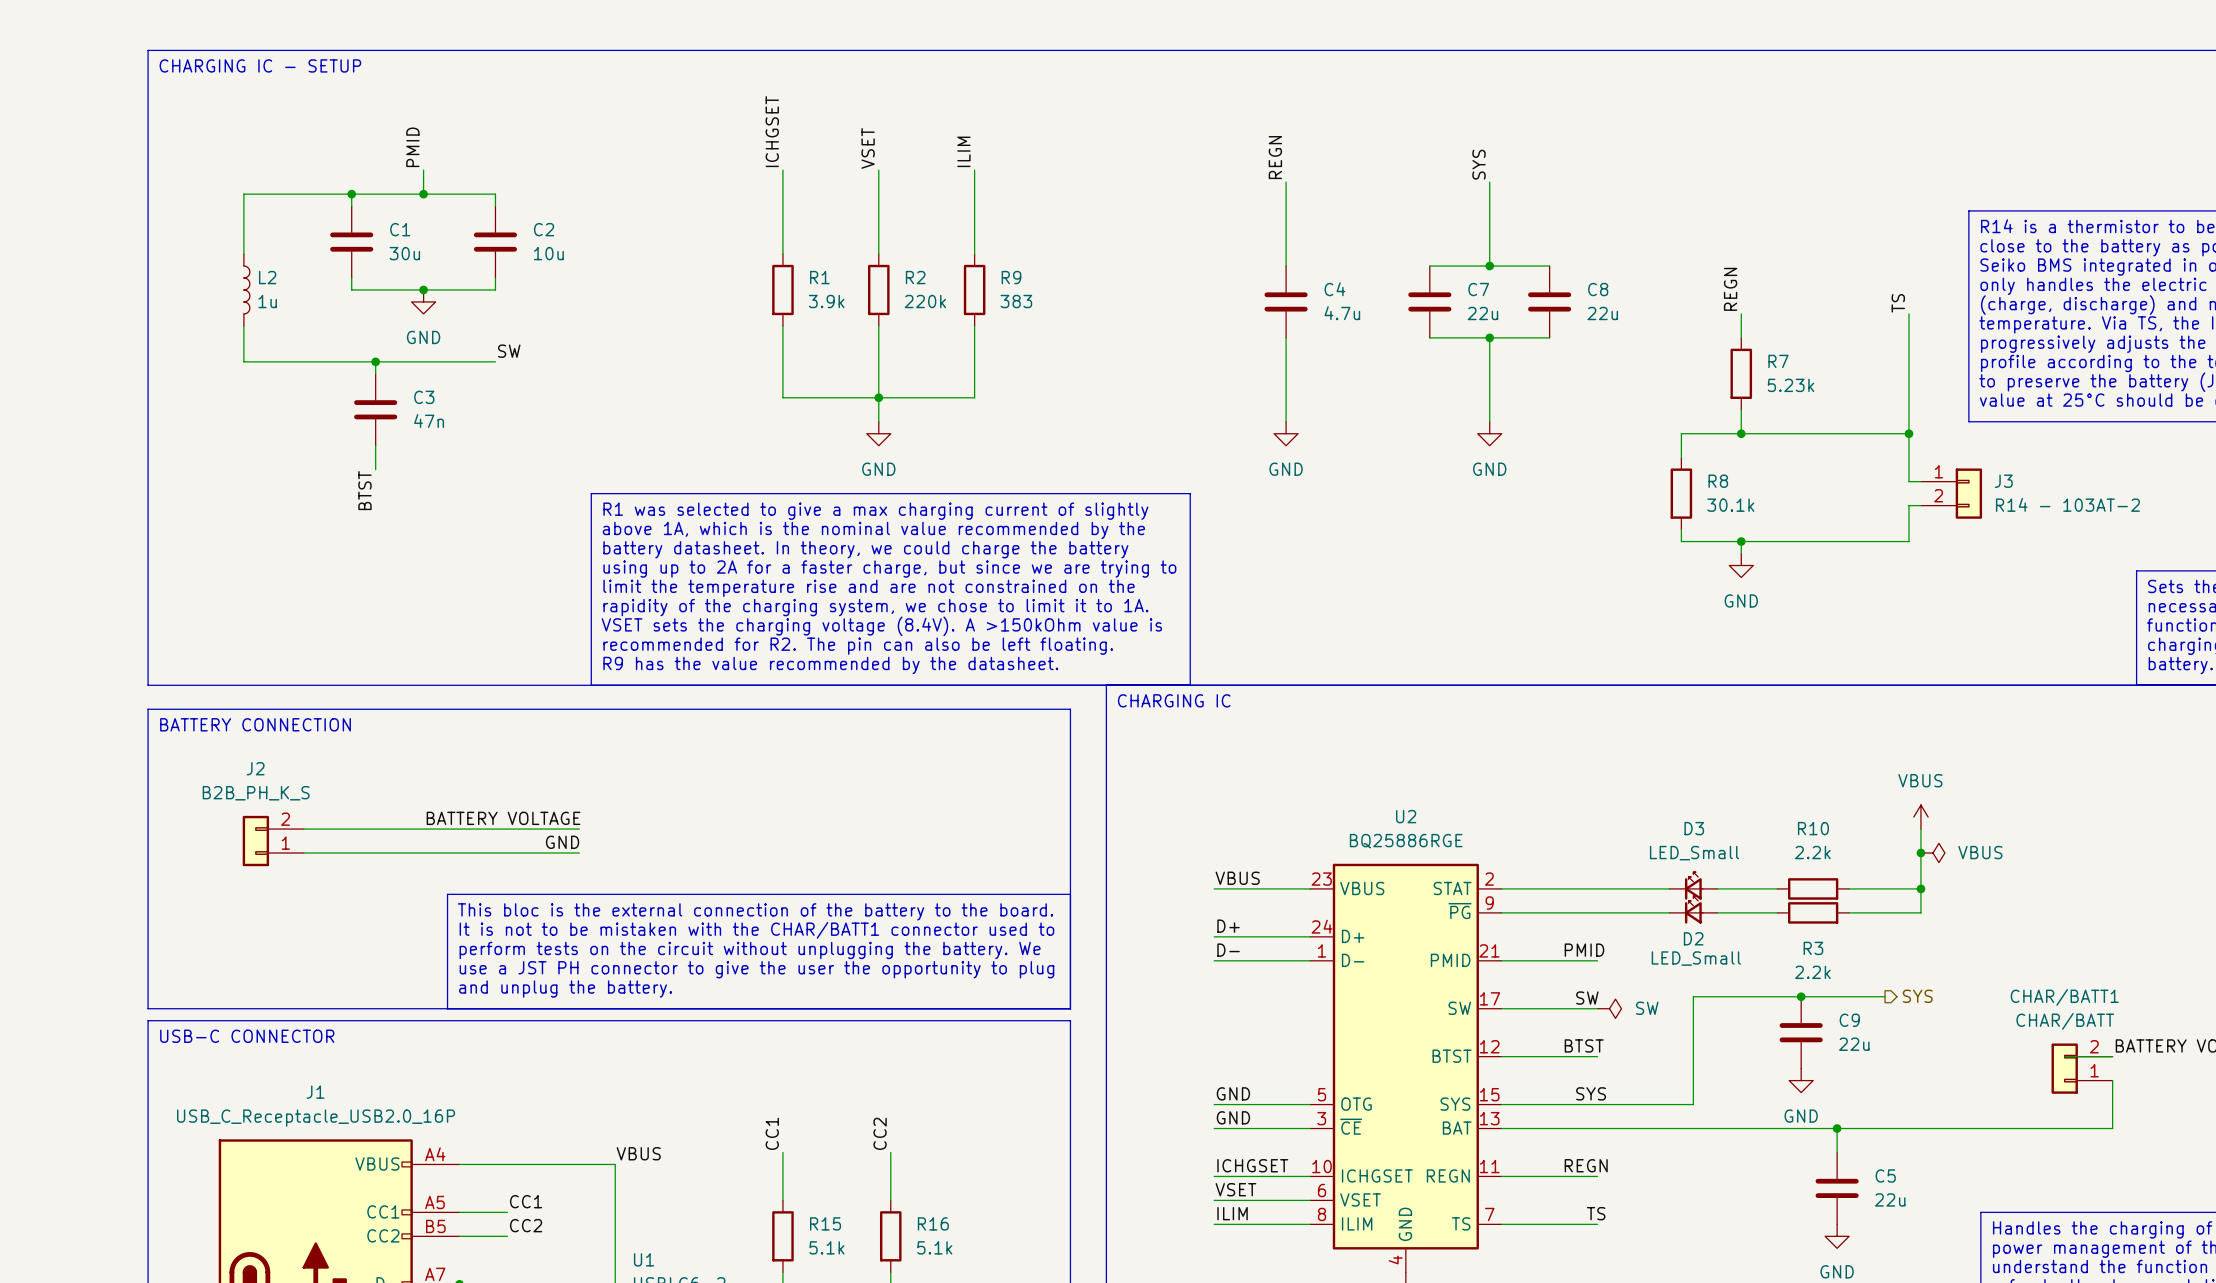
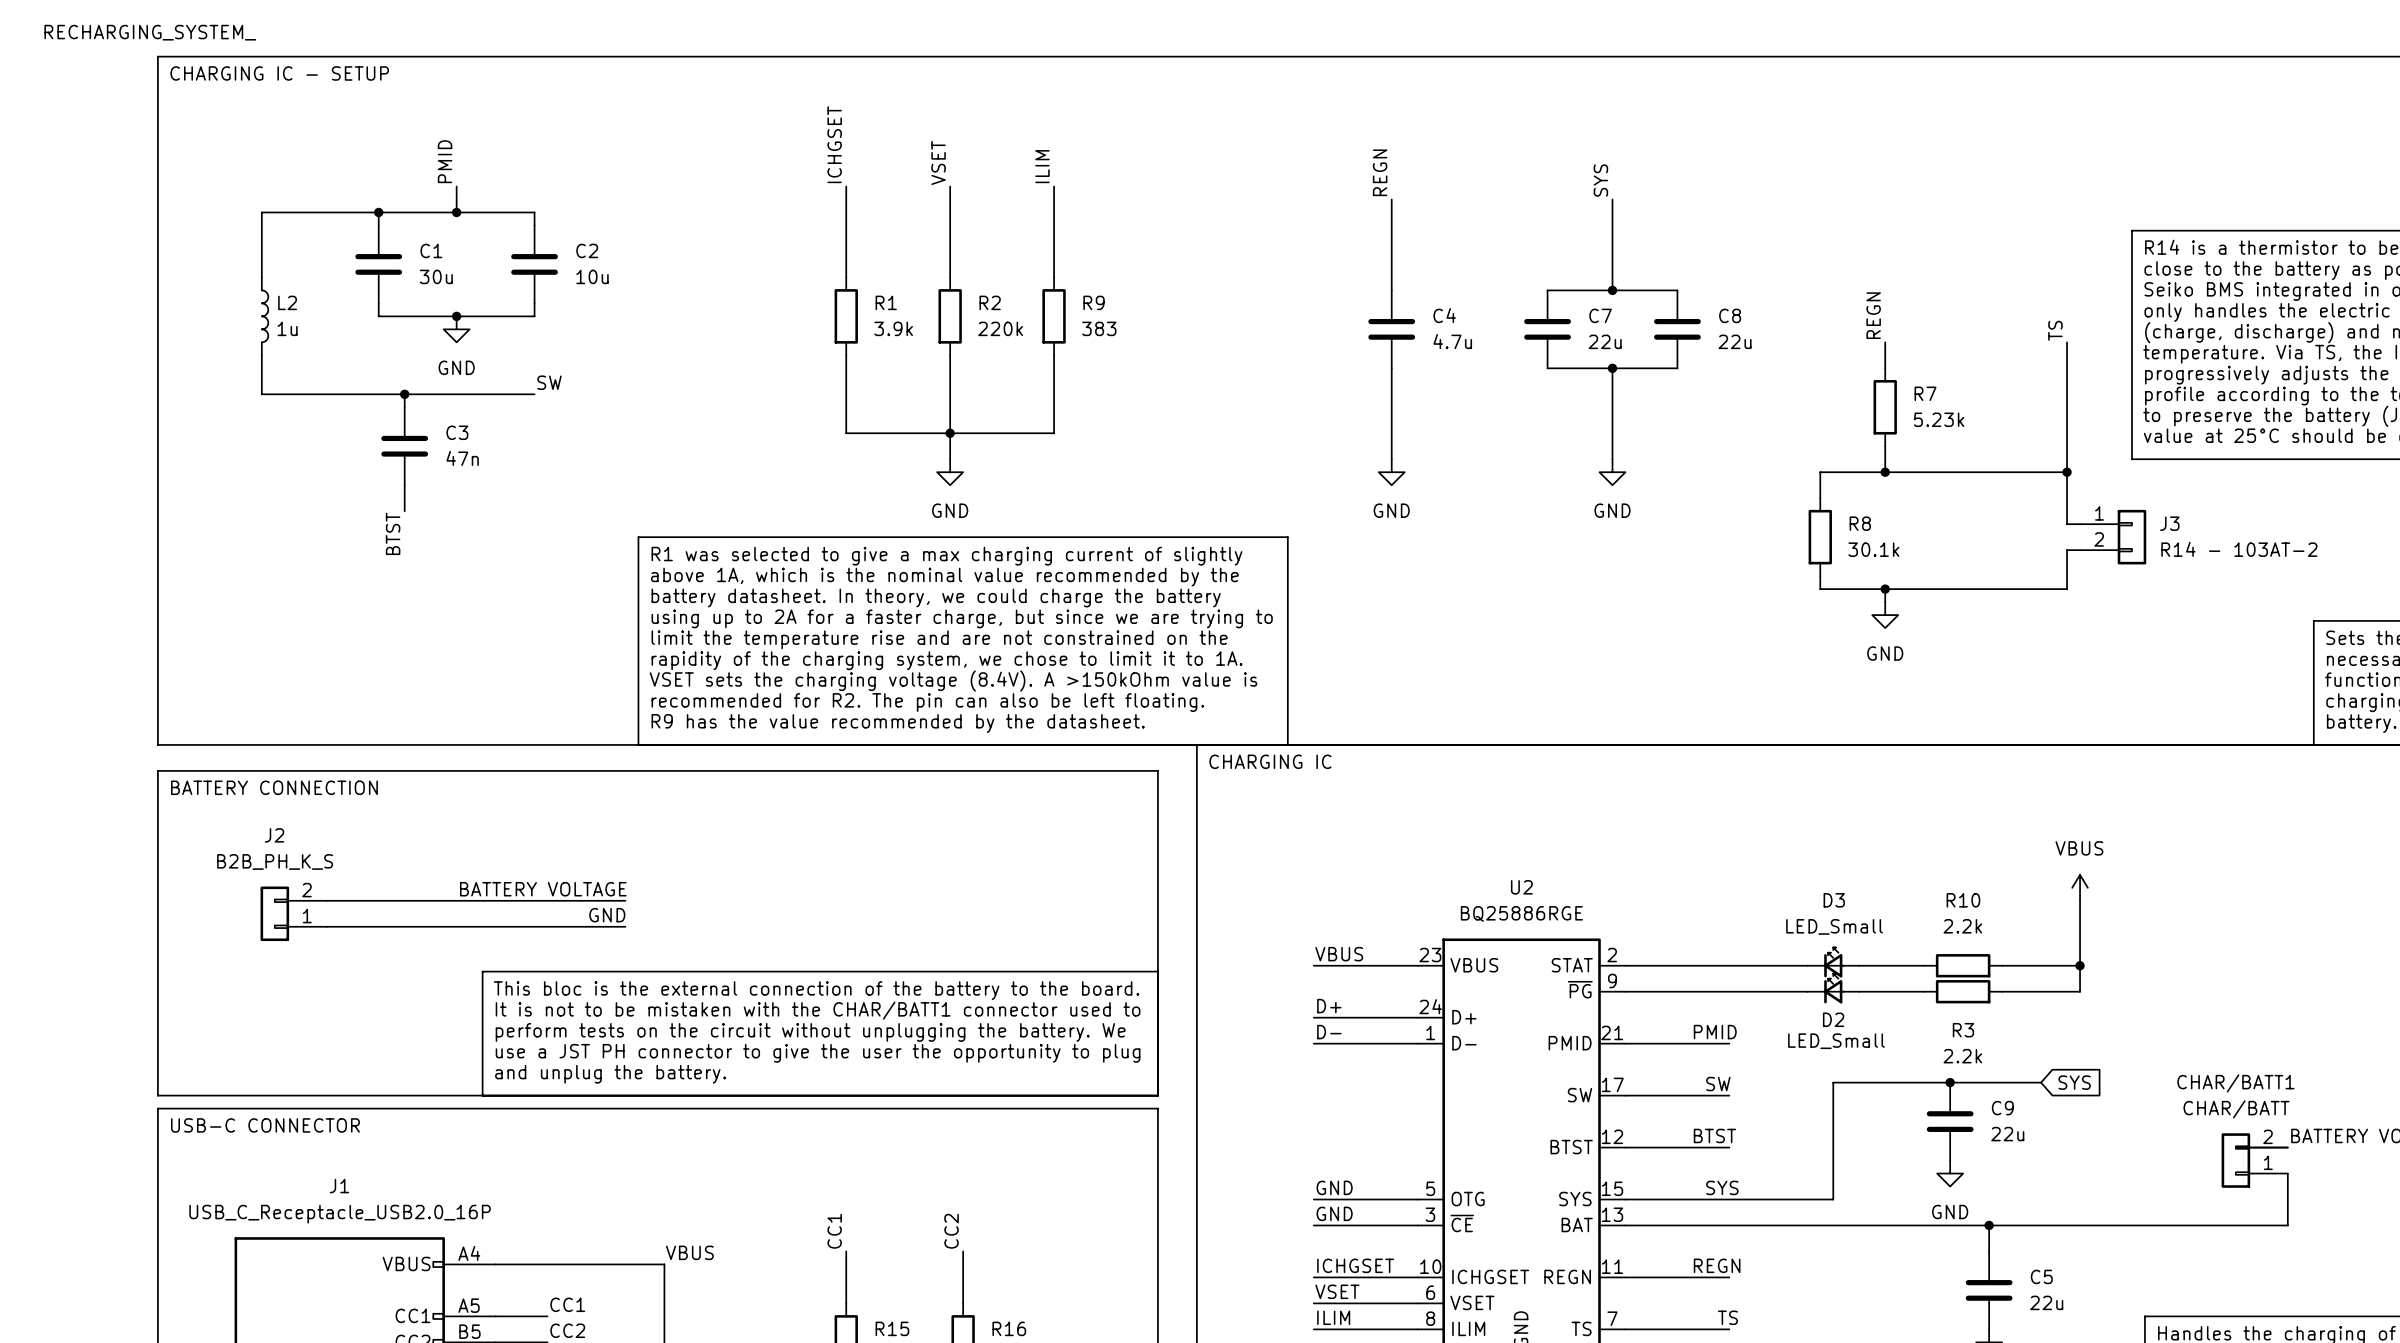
label: none -> RECHARGING_SYSTEM_ (150, 32)
junction: (1920, 853) -> none
power symbol: VBUS (1932, 853) -> none
global label: none -> SYS (2074, 1082)
hierarchical label: SYS (1917, 996) -> none
power symbol: SW (1609, 1008) -> none

